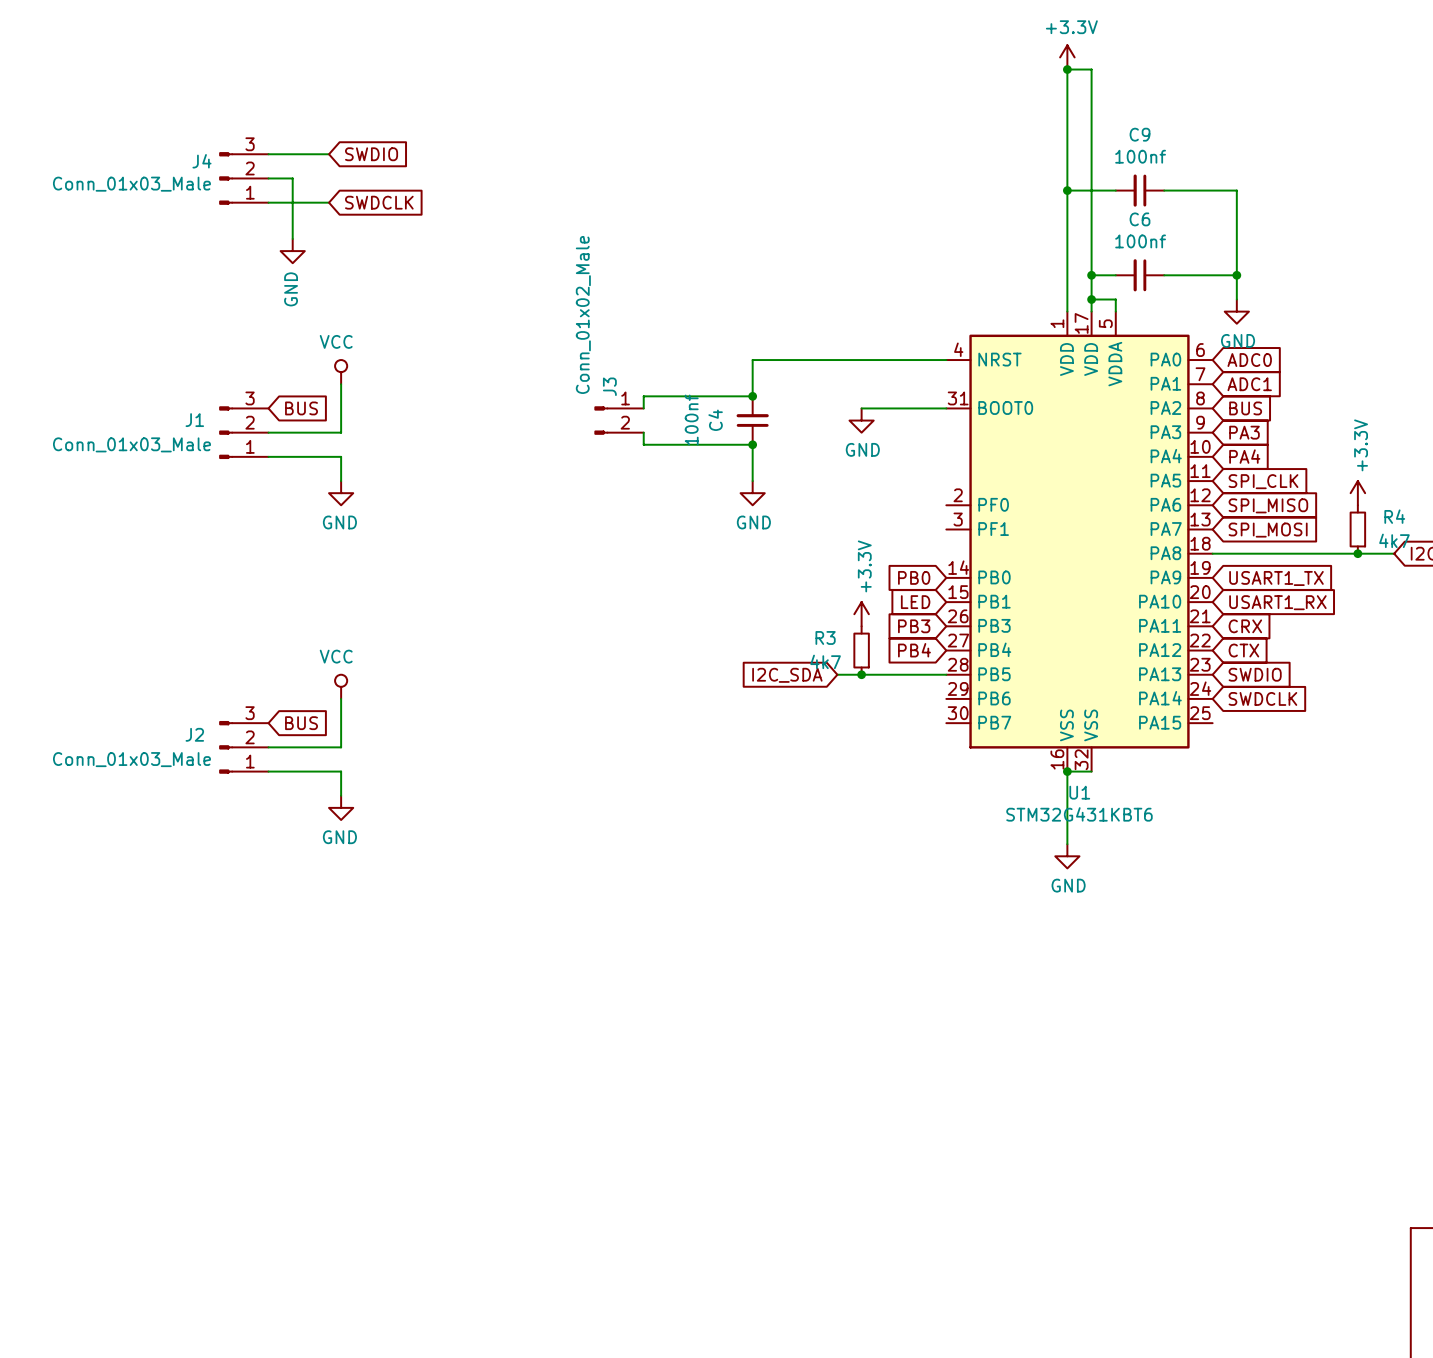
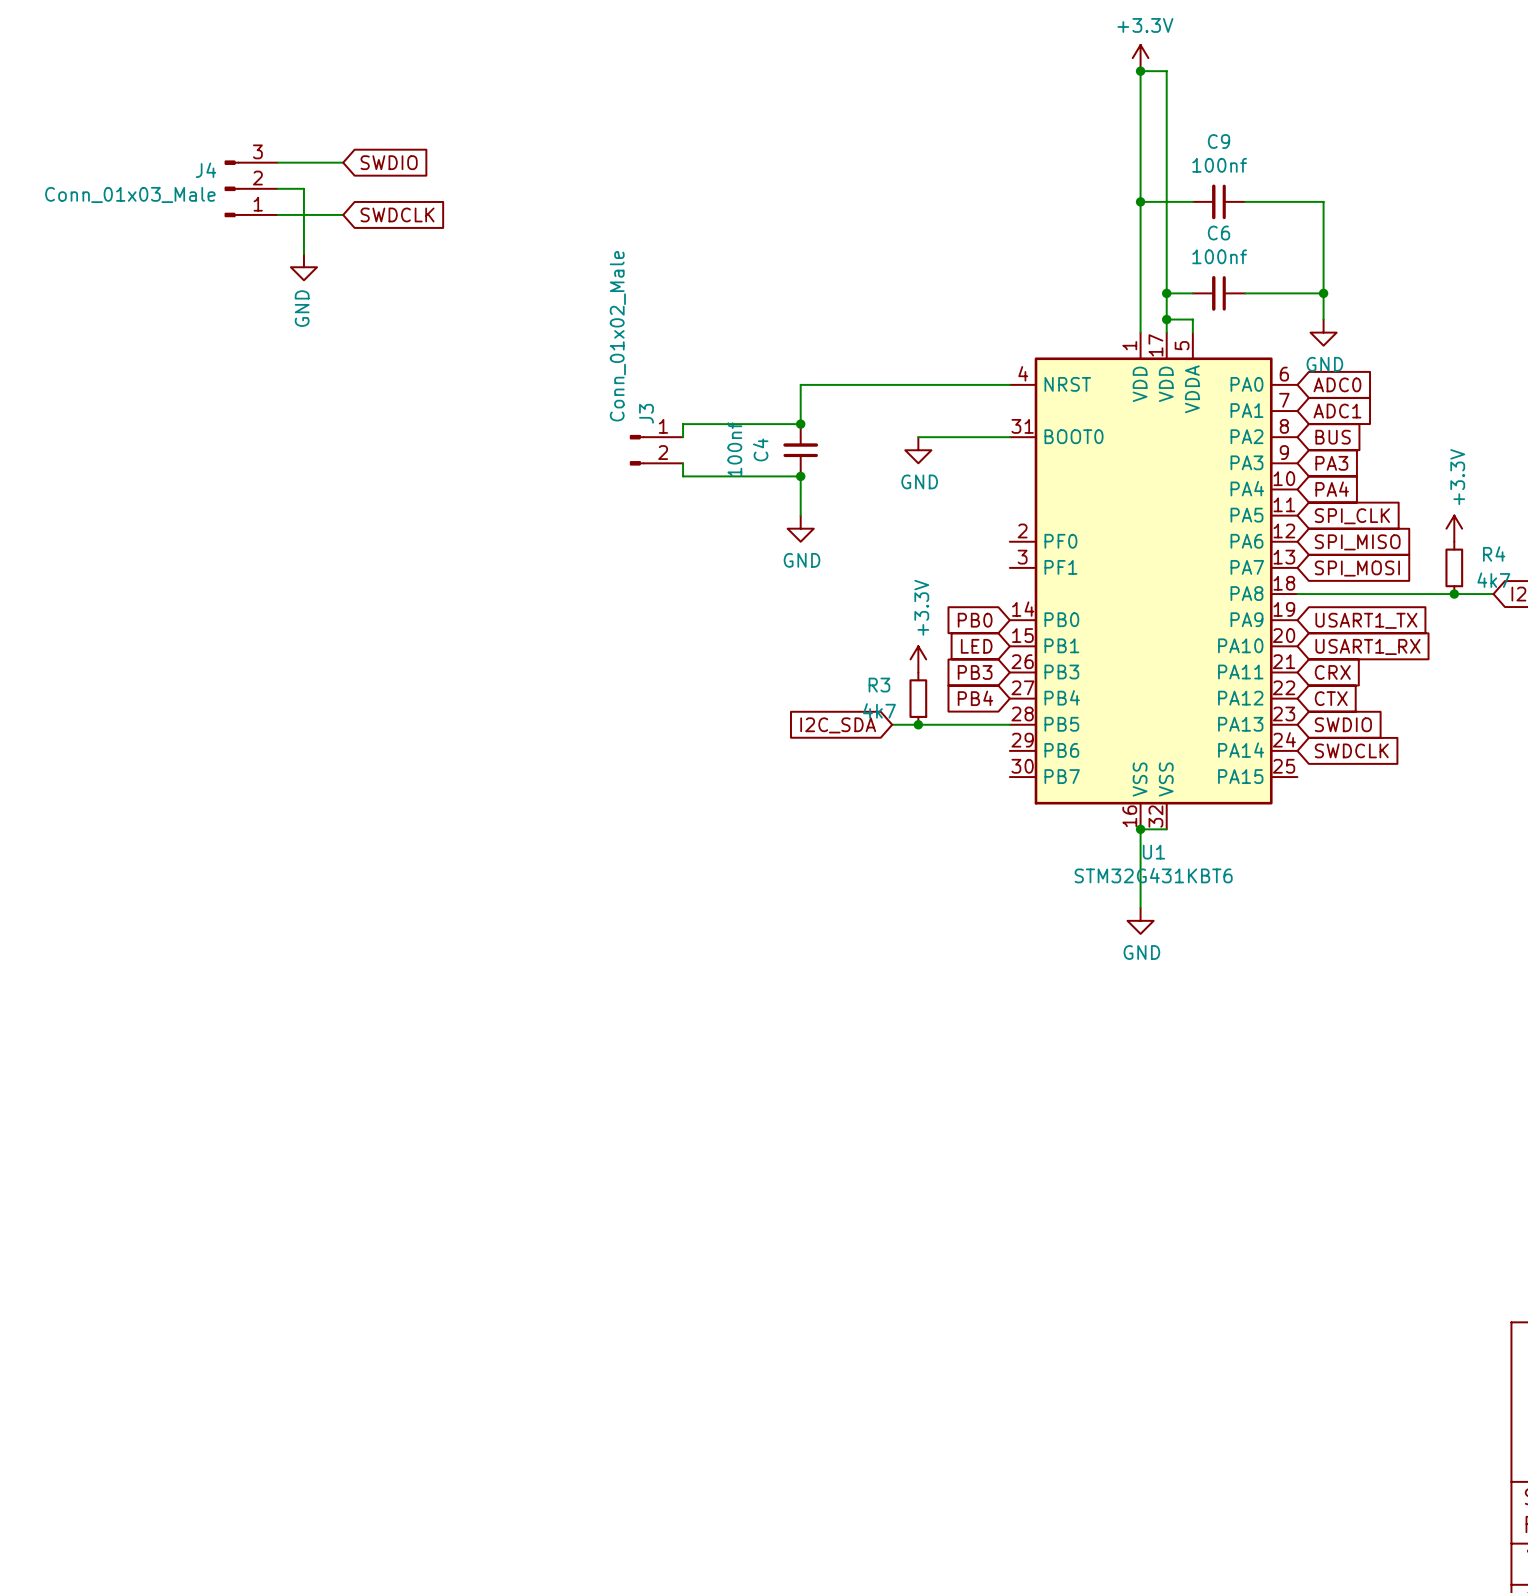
power symbol: VCC (341, 372) -> none
wire: (341, 384) (341, 432) (268, 432) -> none
global label: BUS (301, 408) -> none
J1: Conn_01x03_Male (243, 432) -> none
wire: (268, 456) (341, 456) (341, 481) -> none
power symbol: GND (341, 493) -> none
power symbol: VCC (341, 686) -> none
wire: (341, 698) (341, 747) (268, 747) -> none
global label: BUS (301, 723) -> none
J2: Conn_01x03_Male (243, 747) -> none
wire: (268, 771) (341, 771) (341, 795) -> none
power symbol: GND (341, 807) -> none

